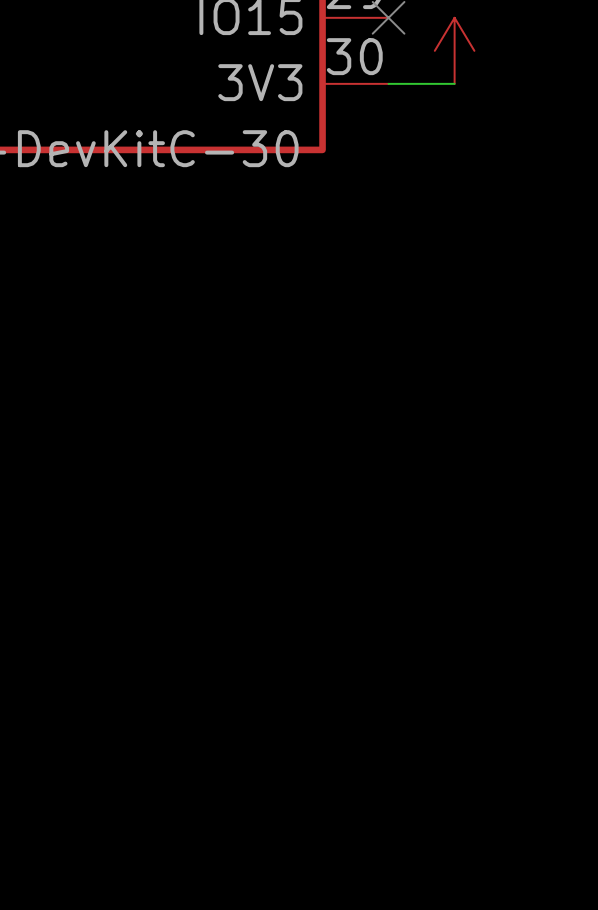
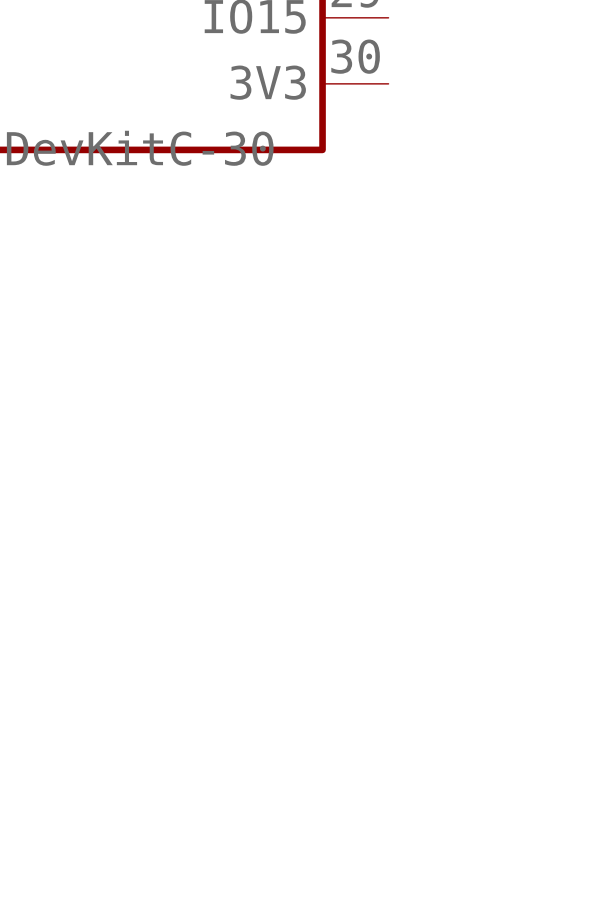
no-connect mark: (388, 17) -> none
power symbol: (454, 50) -> none
wire: (388, 83) (454, 83) -> none

